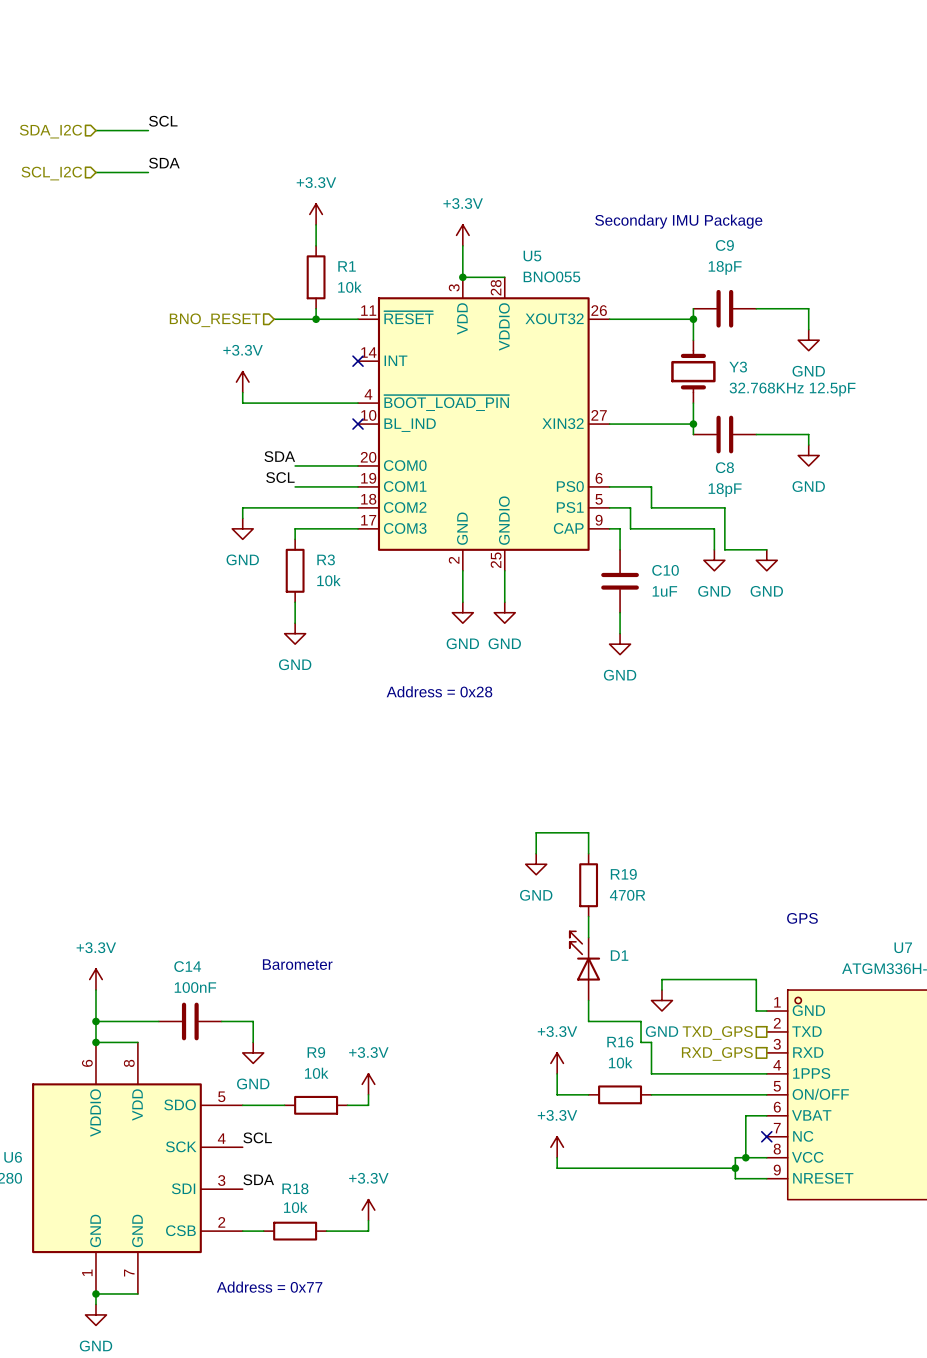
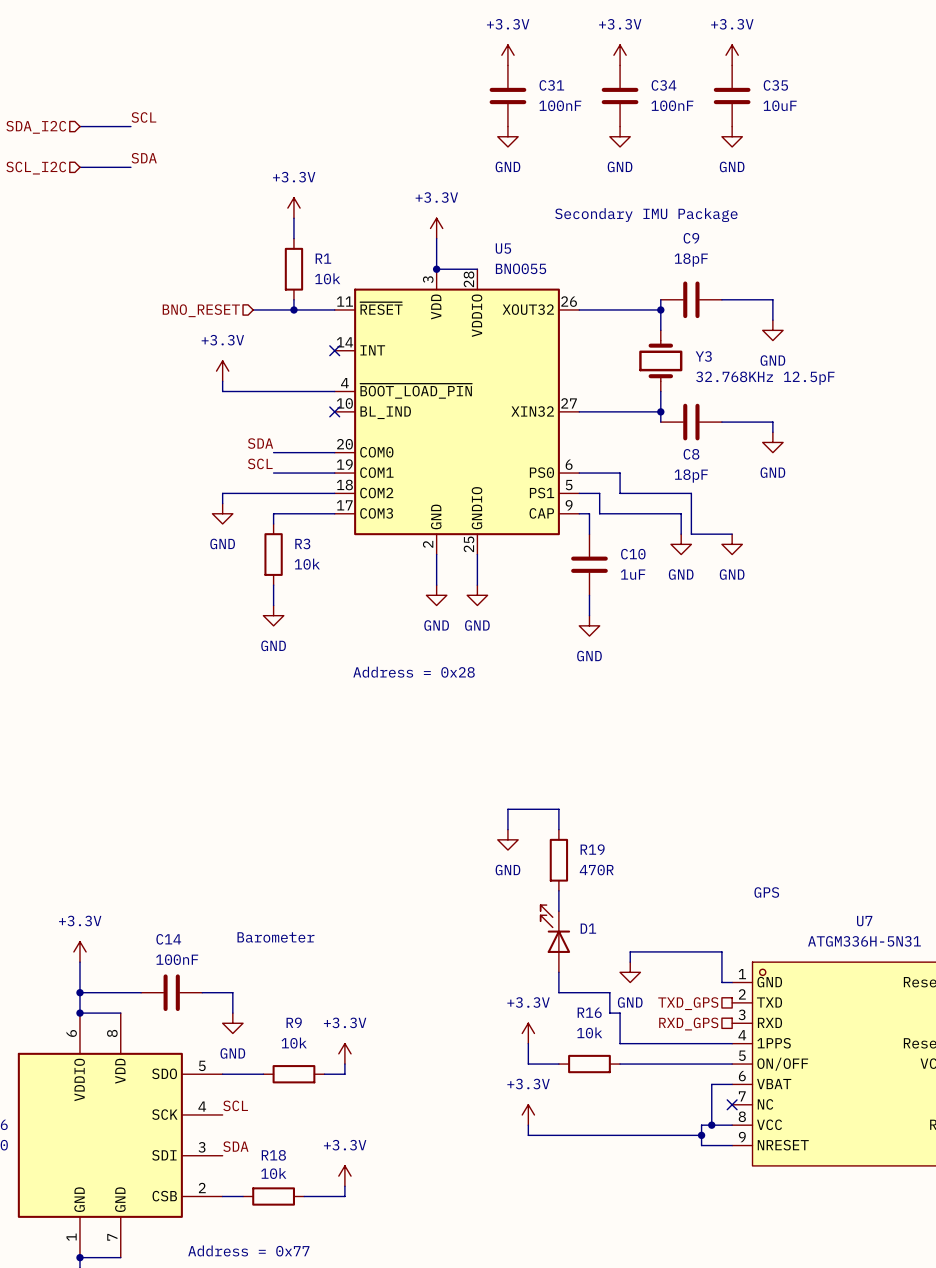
power symbol: none -> +3.3V (507, 55)
power symbol: none -> +3.3V (620, 55)
power symbol: none -> +3.3V (732, 55)
C31: none -> 100nF (507, 96)
C34: none -> 100nF (620, 96)
C35: none -> 10uF (732, 96)
power symbol: none -> GND (507, 136)
power symbol: none -> GND (620, 136)
power symbol: none -> GND (732, 136)

